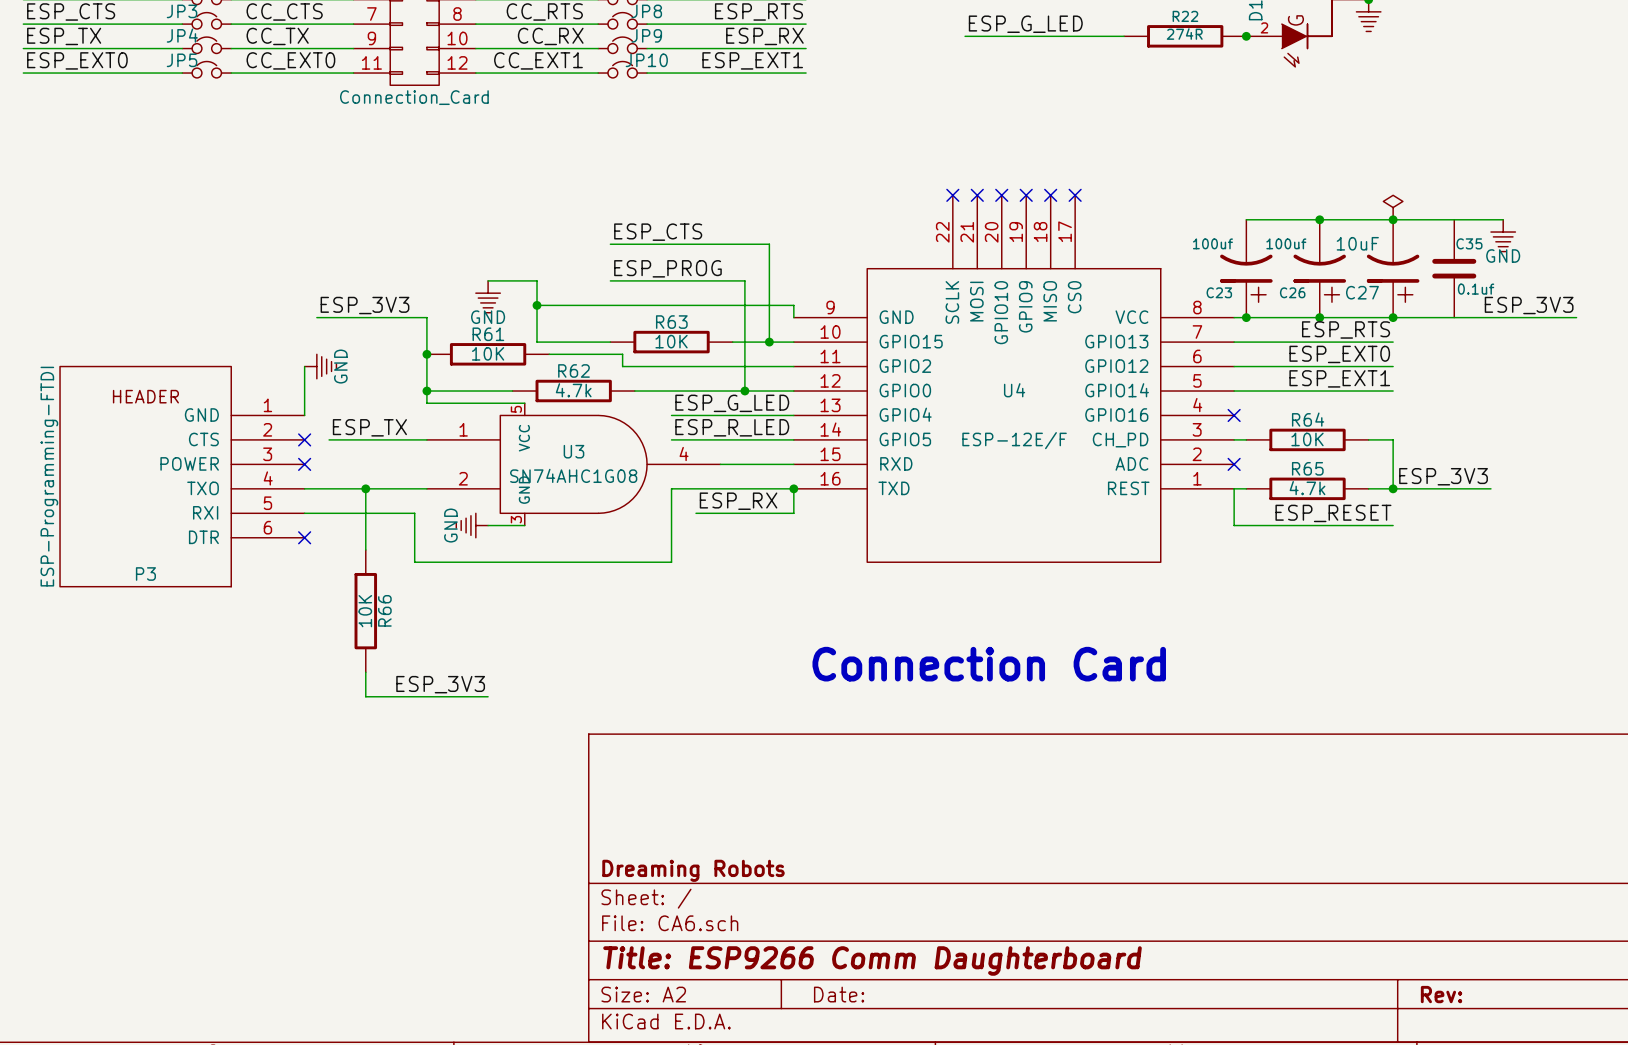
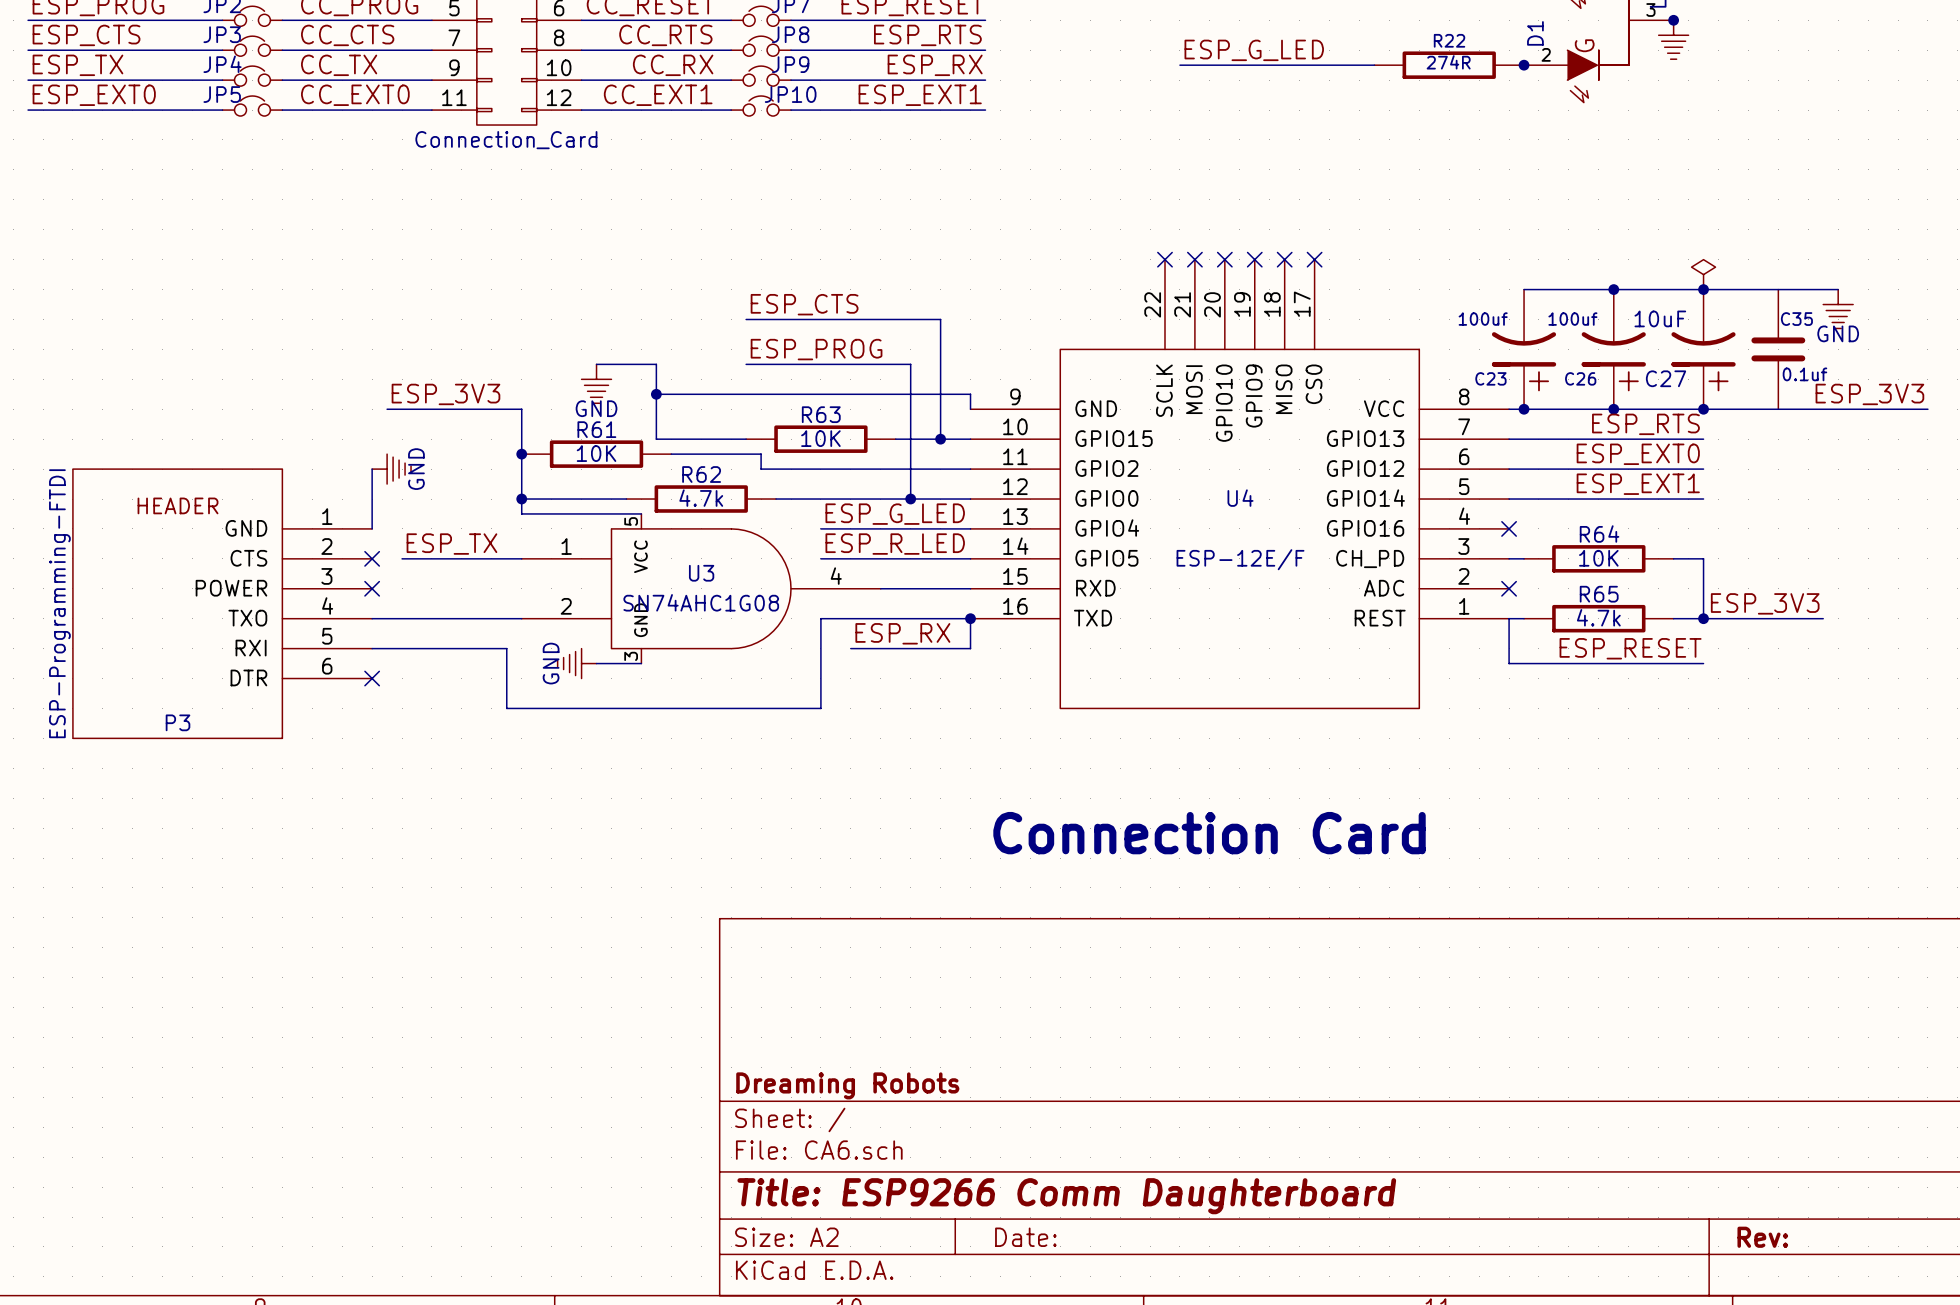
wire: (365, 488) (365, 550) -> none
junction: (365, 488) -> none
R66: 10K (365, 611) -> none
wire: (365, 672) (365, 696) (488, 696) -> none
label: ESP_3V3 (440, 684) -> none

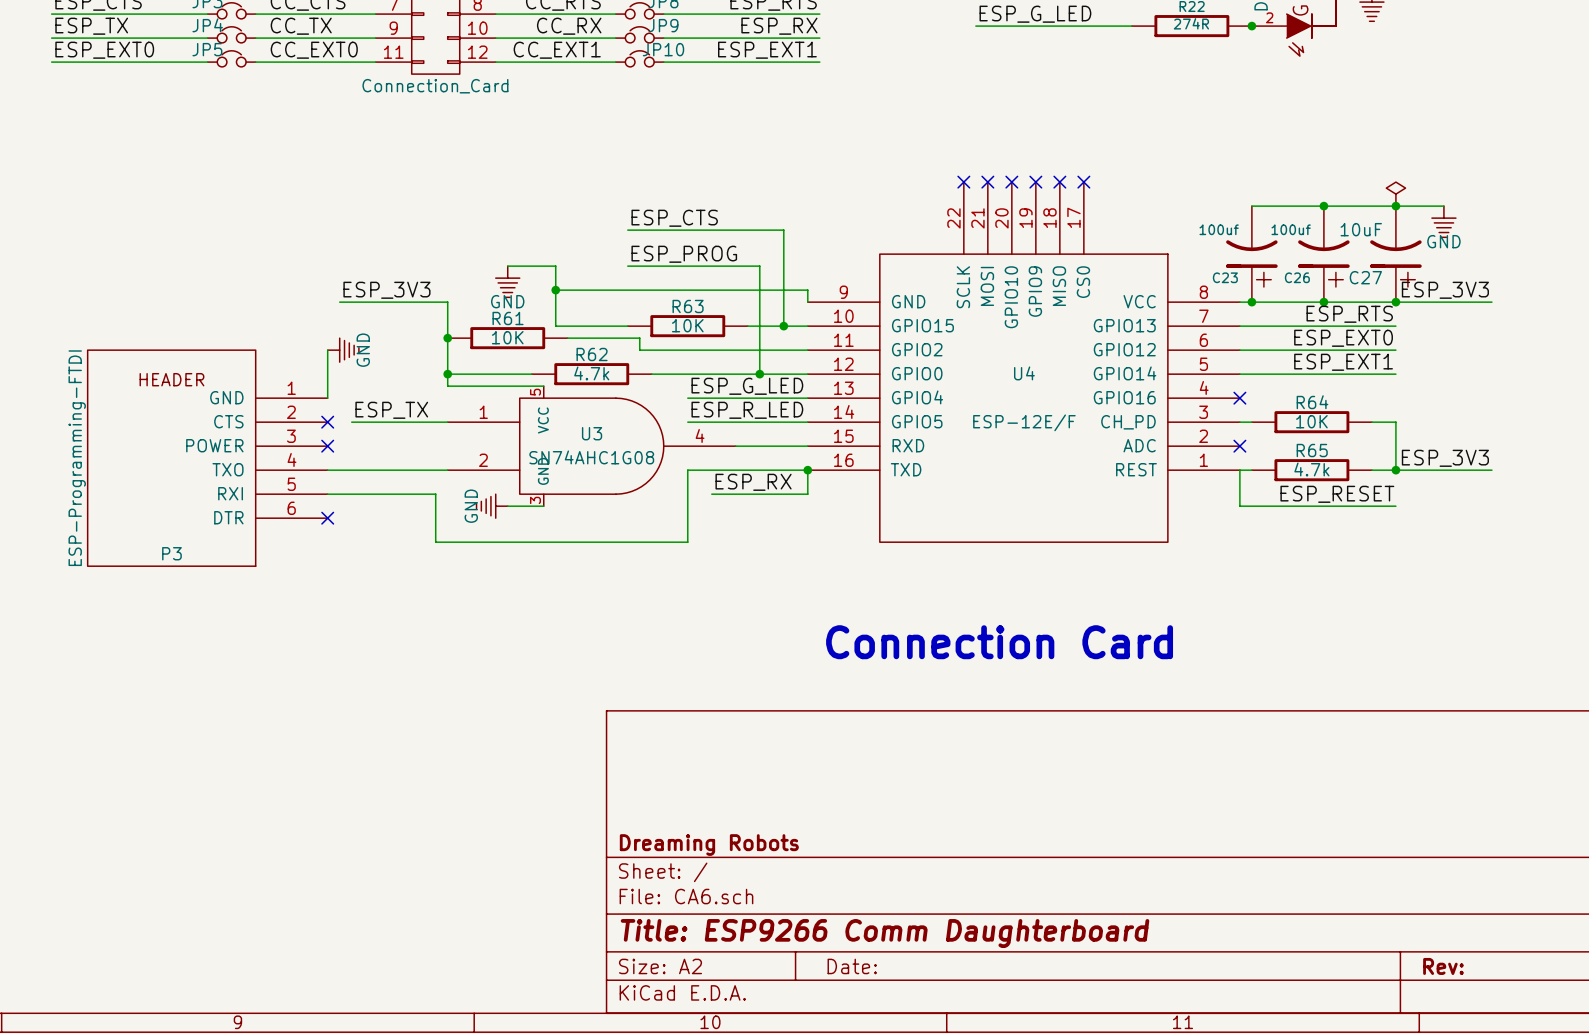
wire: (1763, 289) (1838, 289) -> none
power symbol position: GND (1838, 309) -> GND (1443, 221)
C35: 0.1uf (1778, 349) -> none
label position: ESP_3V3 (1869, 394) -> ESP_3V3 (1445, 290)
wire: (1823, 409) (1927, 409) -> none

